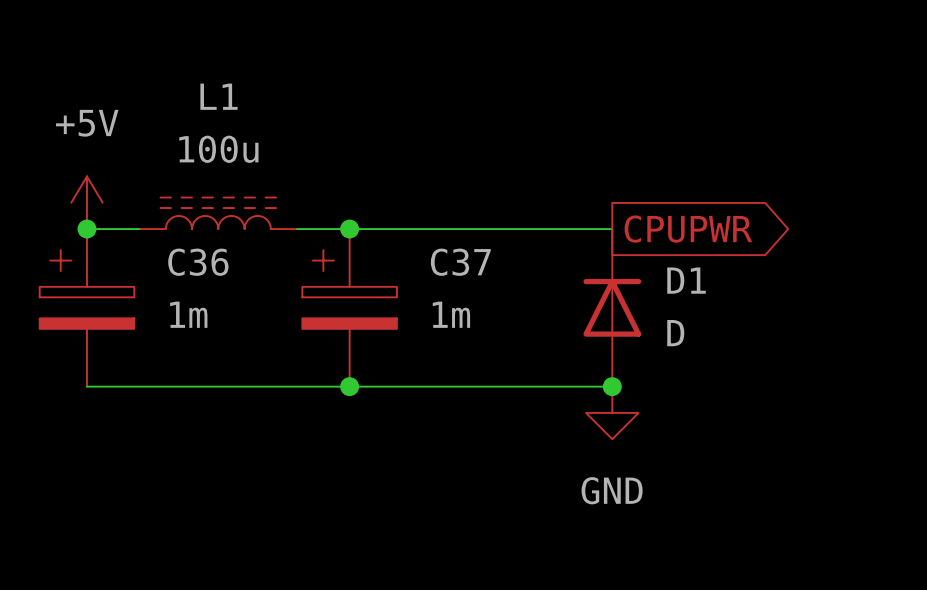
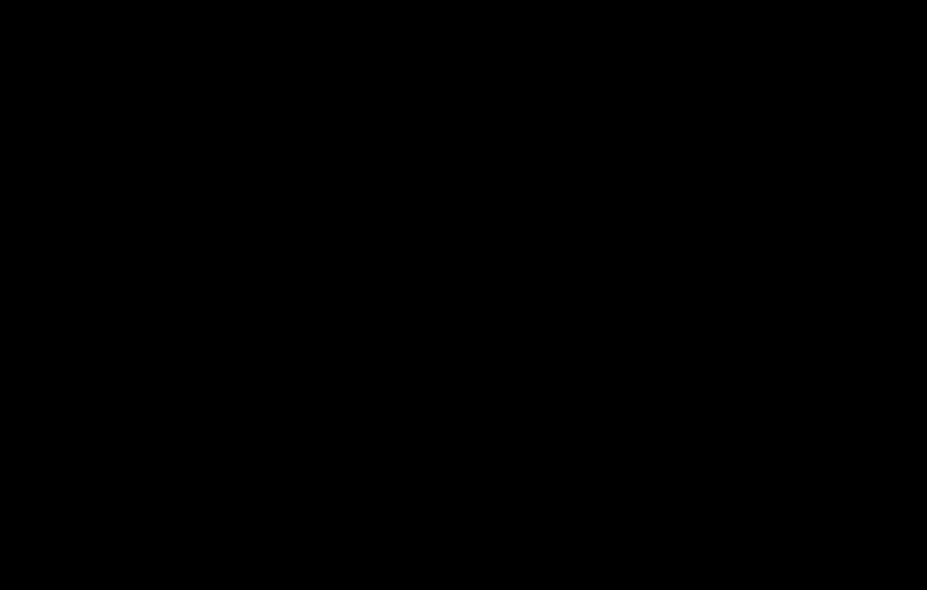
power symbol: +5V (86, 202) -> none
L1: 100u (218, 213) -> none
wire: (86, 229) (139, 229) -> none
junction: (86, 229) -> none
wire: (297, 229) (612, 229) -> none
junction: (349, 229) -> none
global label: CPUPWR (688, 229) -> none
C36: 1m (86, 307) -> none
C37: 1m (349, 307) -> none
D1: D (612, 307) -> none
wire: (86, 386) (612, 386) -> none
junction: (349, 386) -> none
junction: (612, 386) -> none
power symbol: GND (612, 412) -> none

